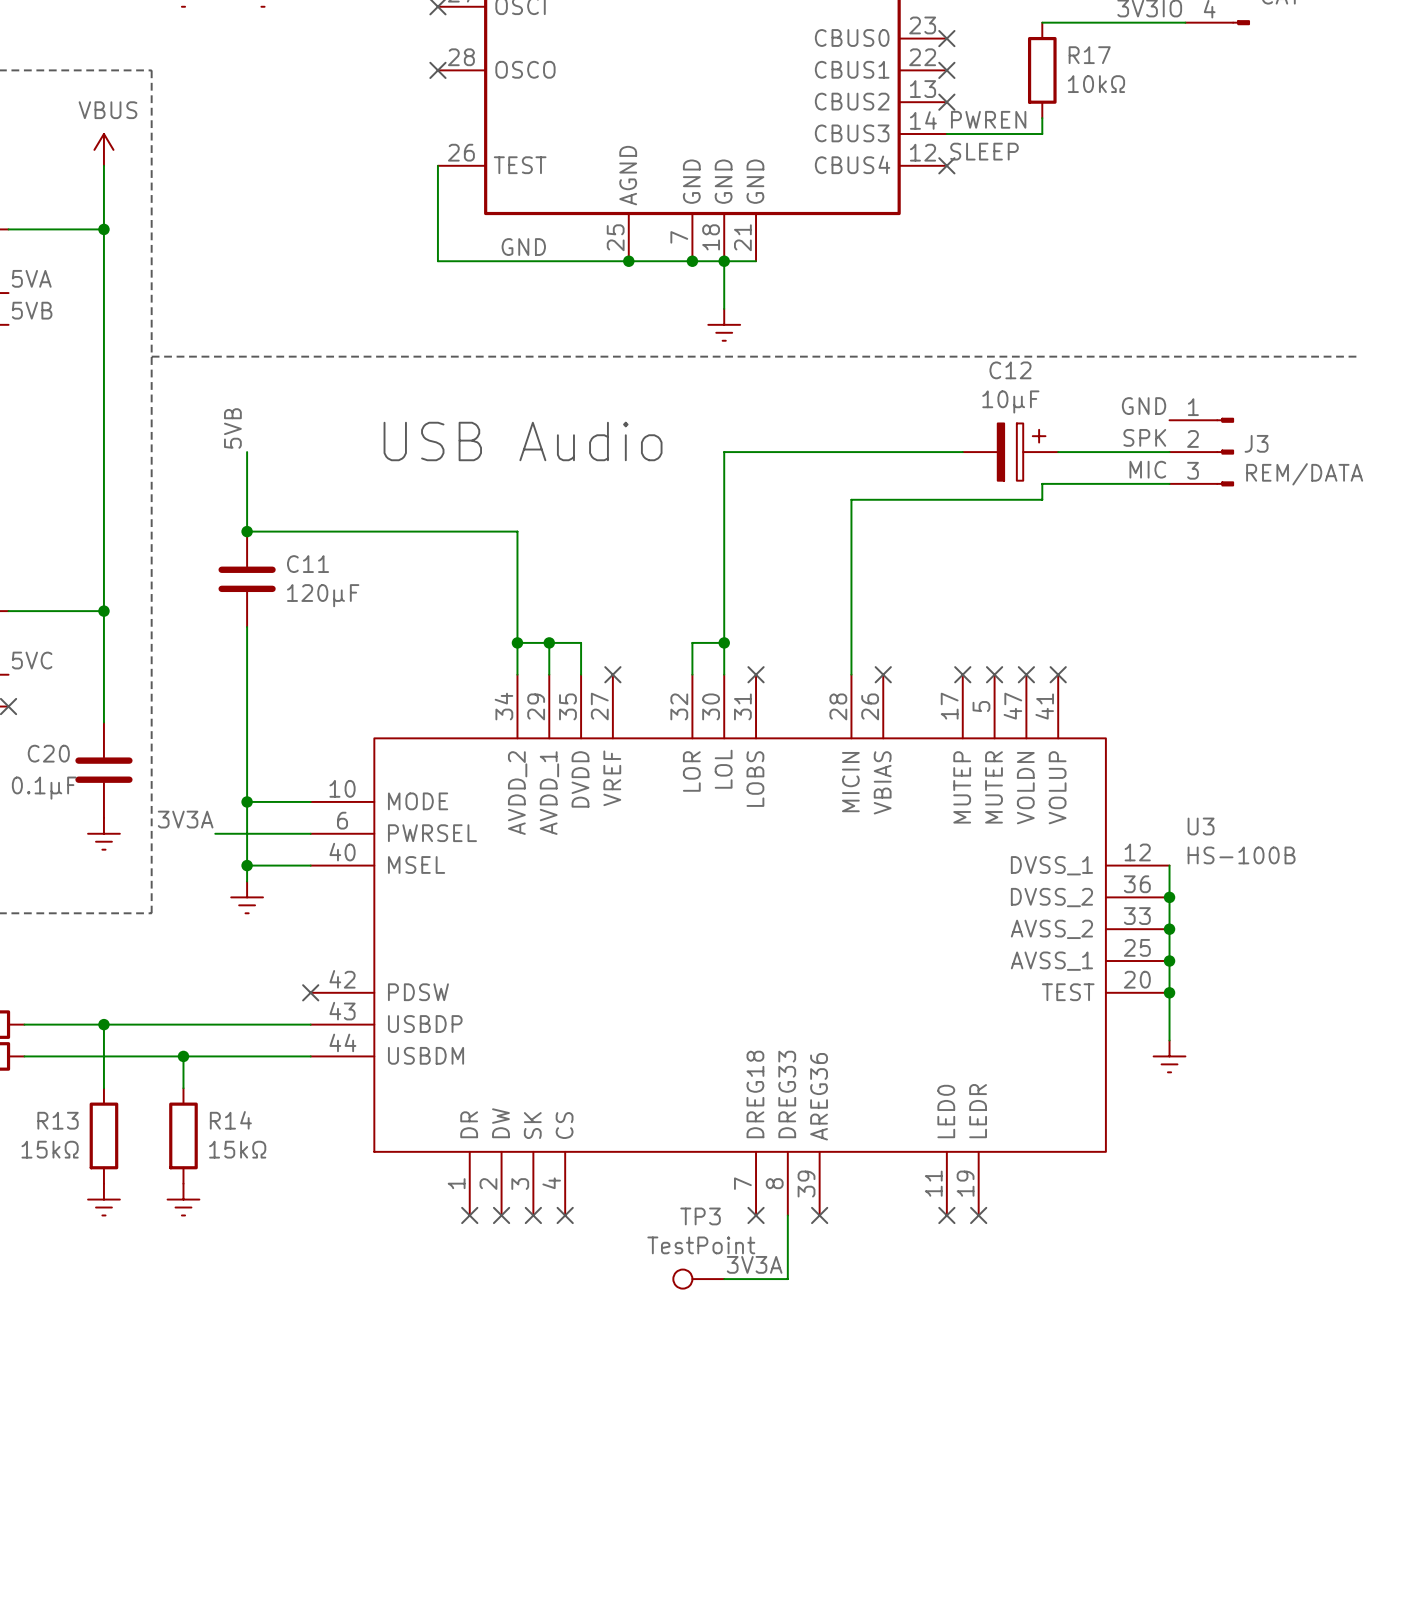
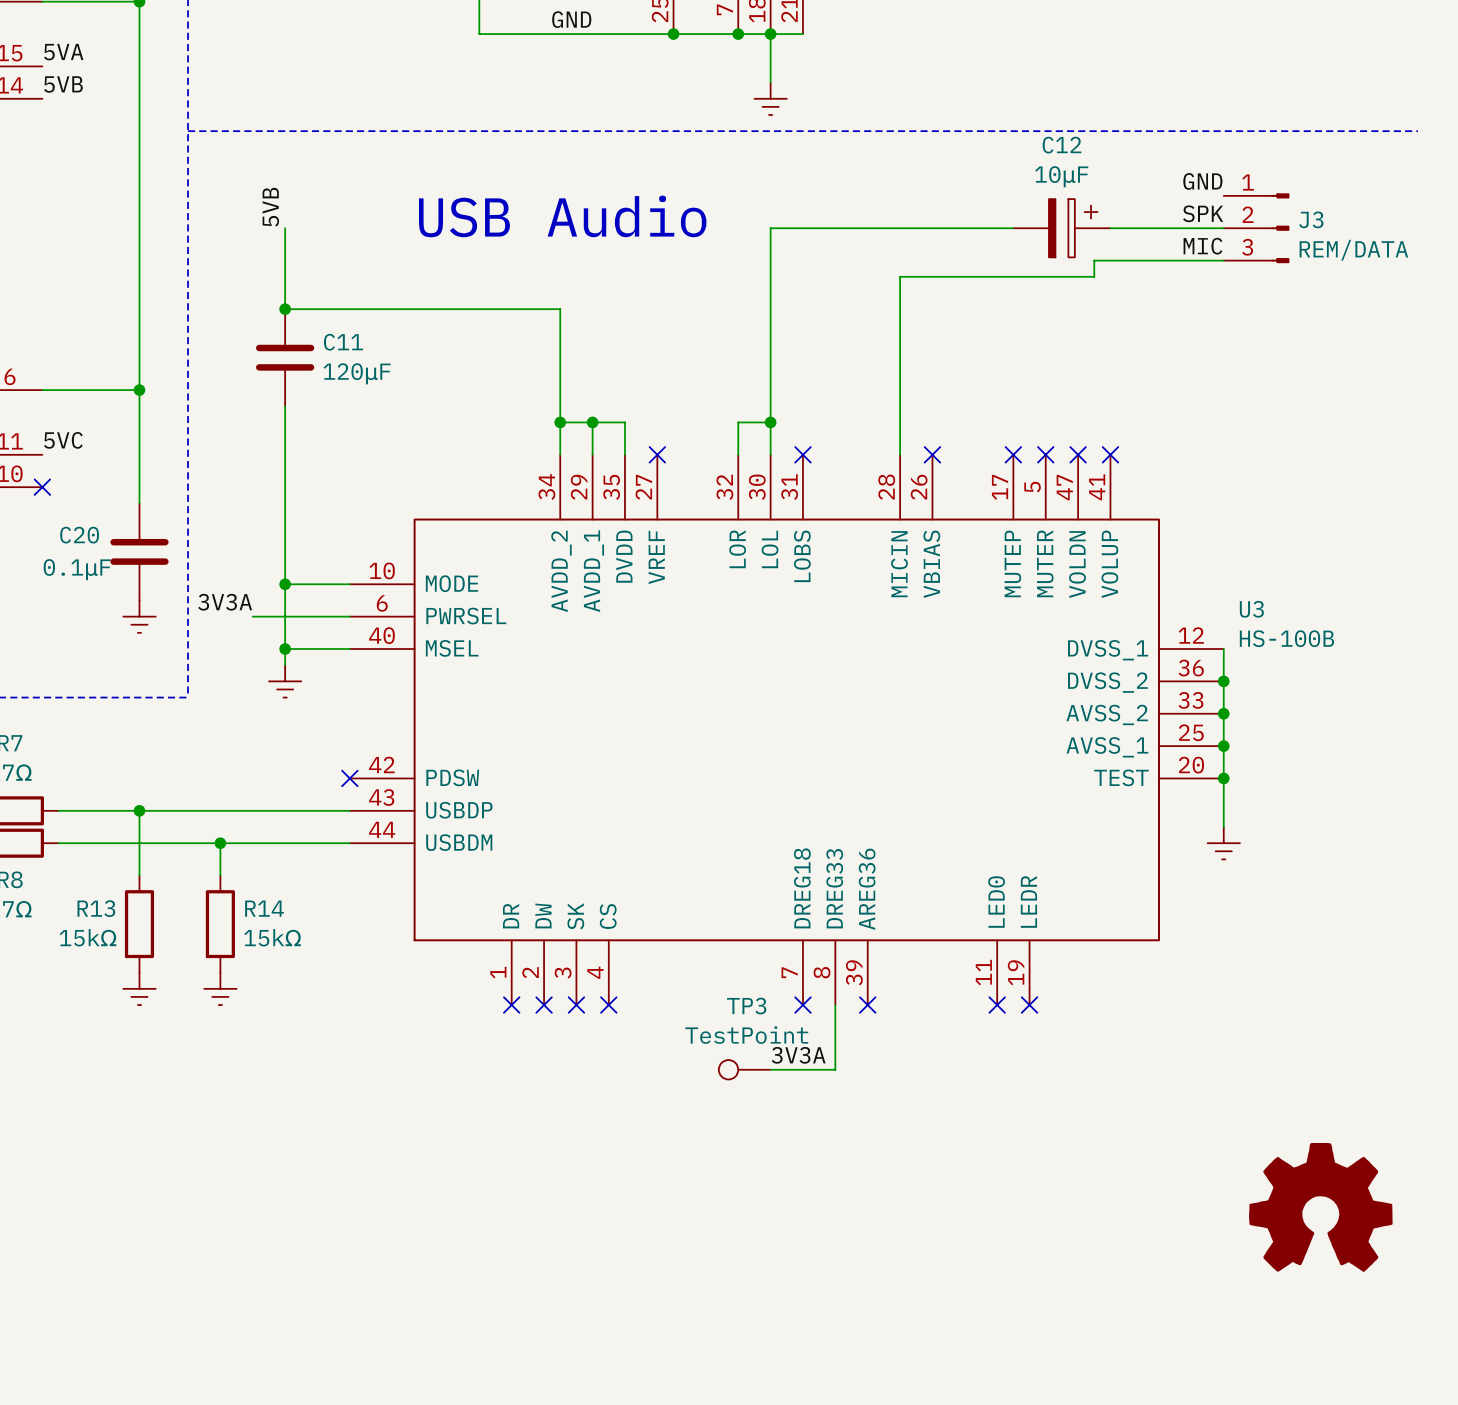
part: none -> (1320, 1207)

